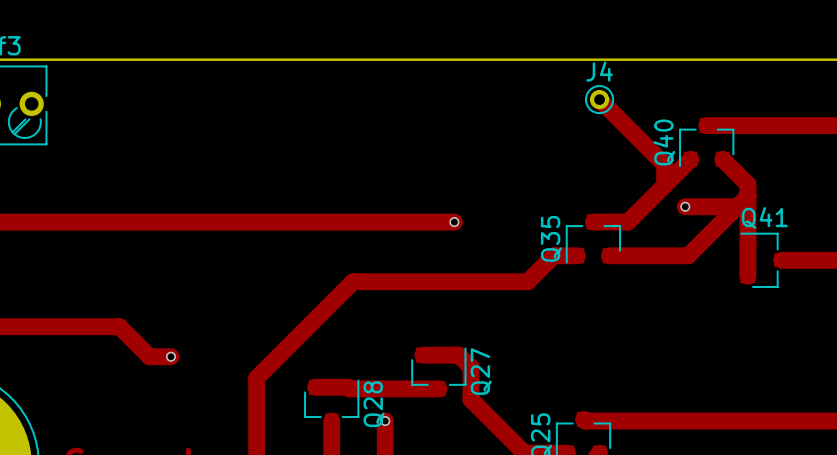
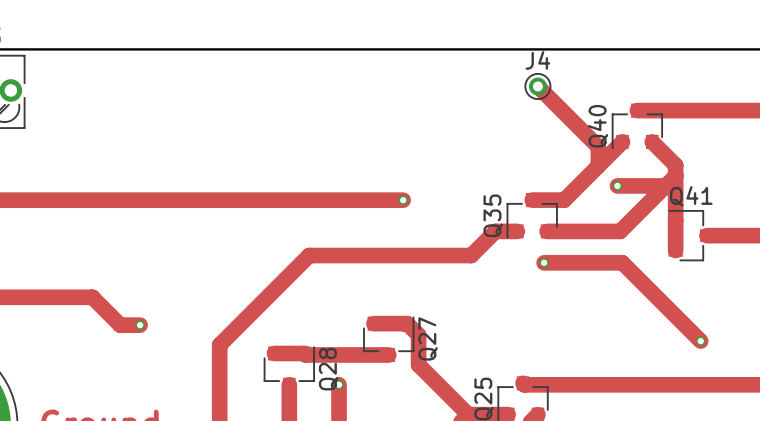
track: none -> (544, 262) (622, 262) (700, 341)
via: none -> (544, 262)
via: none -> (700, 341)

